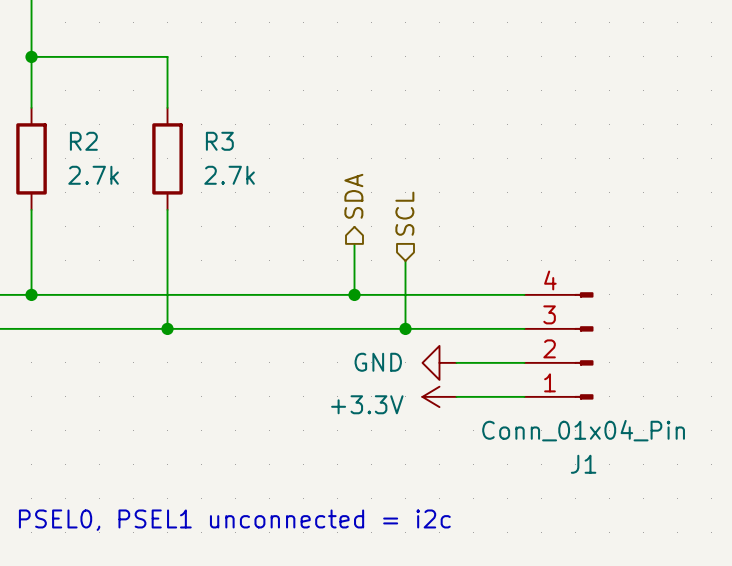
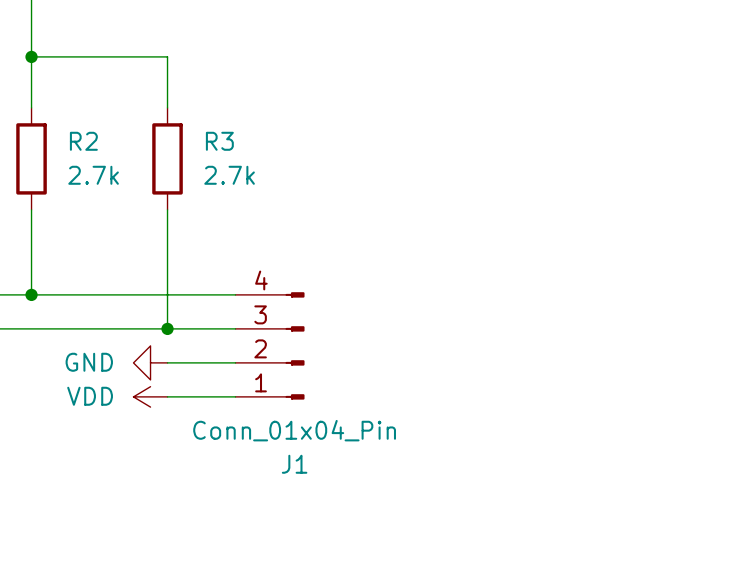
hierarchical label: SDA (353, 196) -> none
hierarchical label: SCL (404, 213) -> none
wire: (354, 243) (354, 294) -> none
wire: (405, 260) (405, 328) -> none
wire: (235, 294) (524, 294) -> none
junction: (354, 294) -> none
wire: (235, 328) (524, 328) -> none
junction: (405, 328) -> none
J1 position: (559, 345) -> (270, 345)
power symbol position: GND (439, 362) -> GND (150, 362)
wire: (456, 362) (524, 362) -> (167, 362) (235, 362)
power symbol: none -> VDD (150, 396)
power symbol: +3.3V (439, 396) -> none
wire: (456, 396) (524, 396) -> (167, 396) (235, 396)
text: PSEL0, PSEL1 unconnected = i2c (234, 520) -> none

